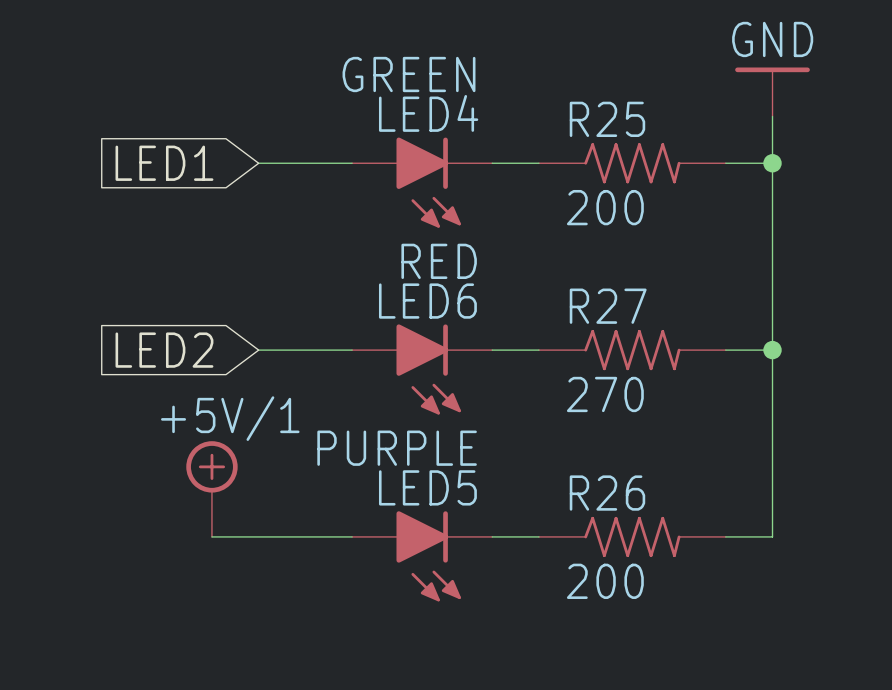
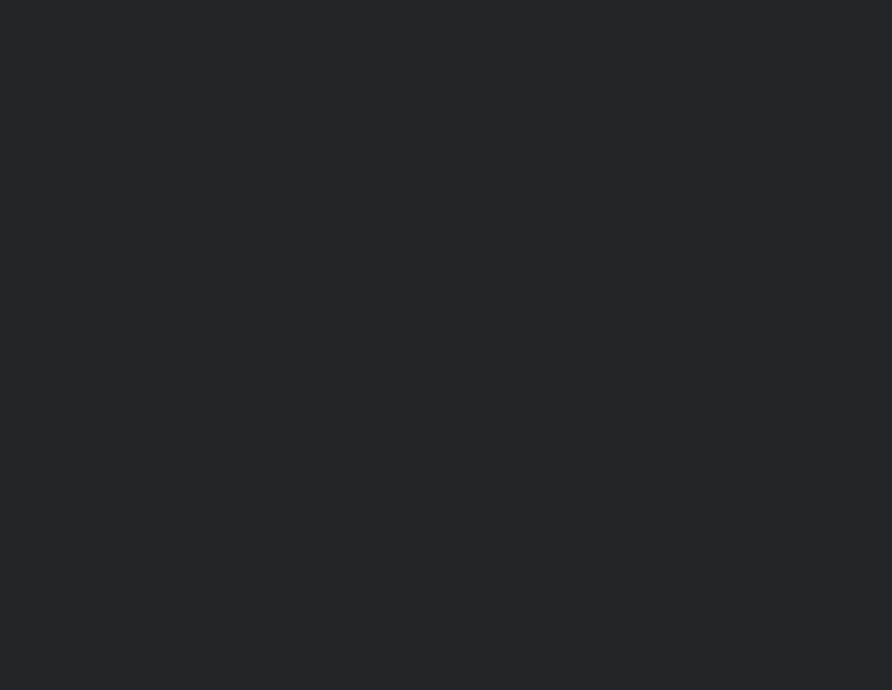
power symbol: GND (772, 92) -> none
wire: (772, 116) (772, 536) (725, 536) -> none
global label: LED1 (164, 163) -> none
wire: (258, 163) (352, 163) -> none
wire: (492, 163) (538, 163) -> none
R25: 200 (632, 163) -> none
wire: (725, 163) (772, 163) -> none
junction: (772, 163) -> none
LED4: GREEN (422, 182) -> none
global label: LED2 (164, 350) -> none
wire: (258, 350) (352, 350) -> none
wire: (492, 350) (538, 350) -> none
R27: 270 (632, 350) -> none
wire: (725, 350) (772, 350) -> none
junction: (772, 350) -> none
LED6: RED (422, 369) -> none
power symbol: +5V/1 (211, 489) -> none
wire: (211, 536) (352, 536) -> none
wire: (492, 536) (538, 536) -> none
R26: 200 (632, 536) -> none
LED5: PURPLE (422, 556) -> none

